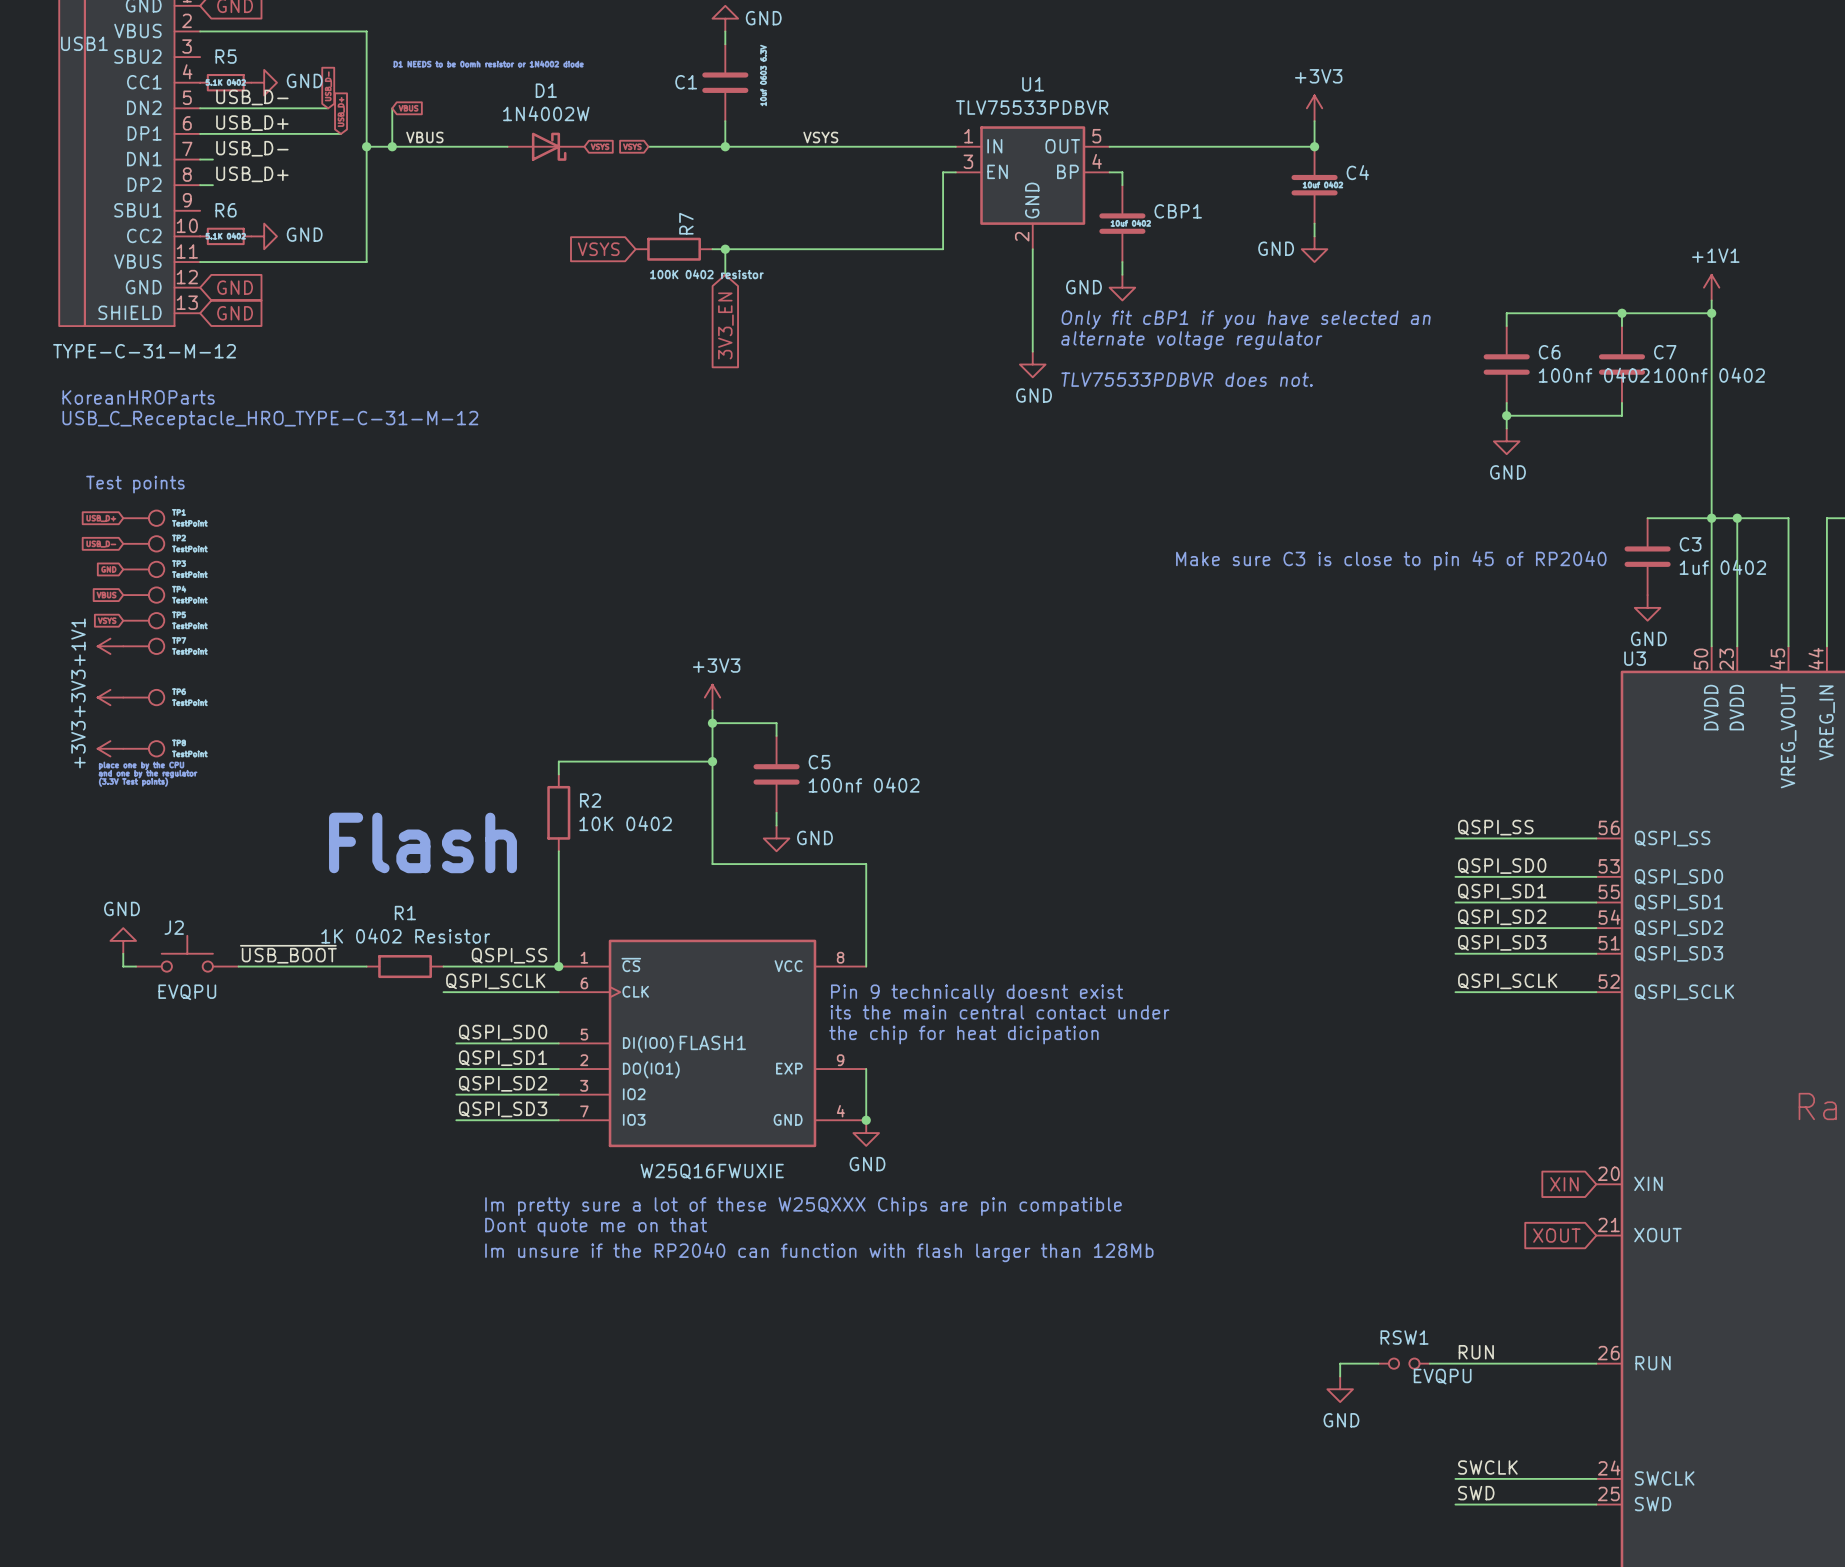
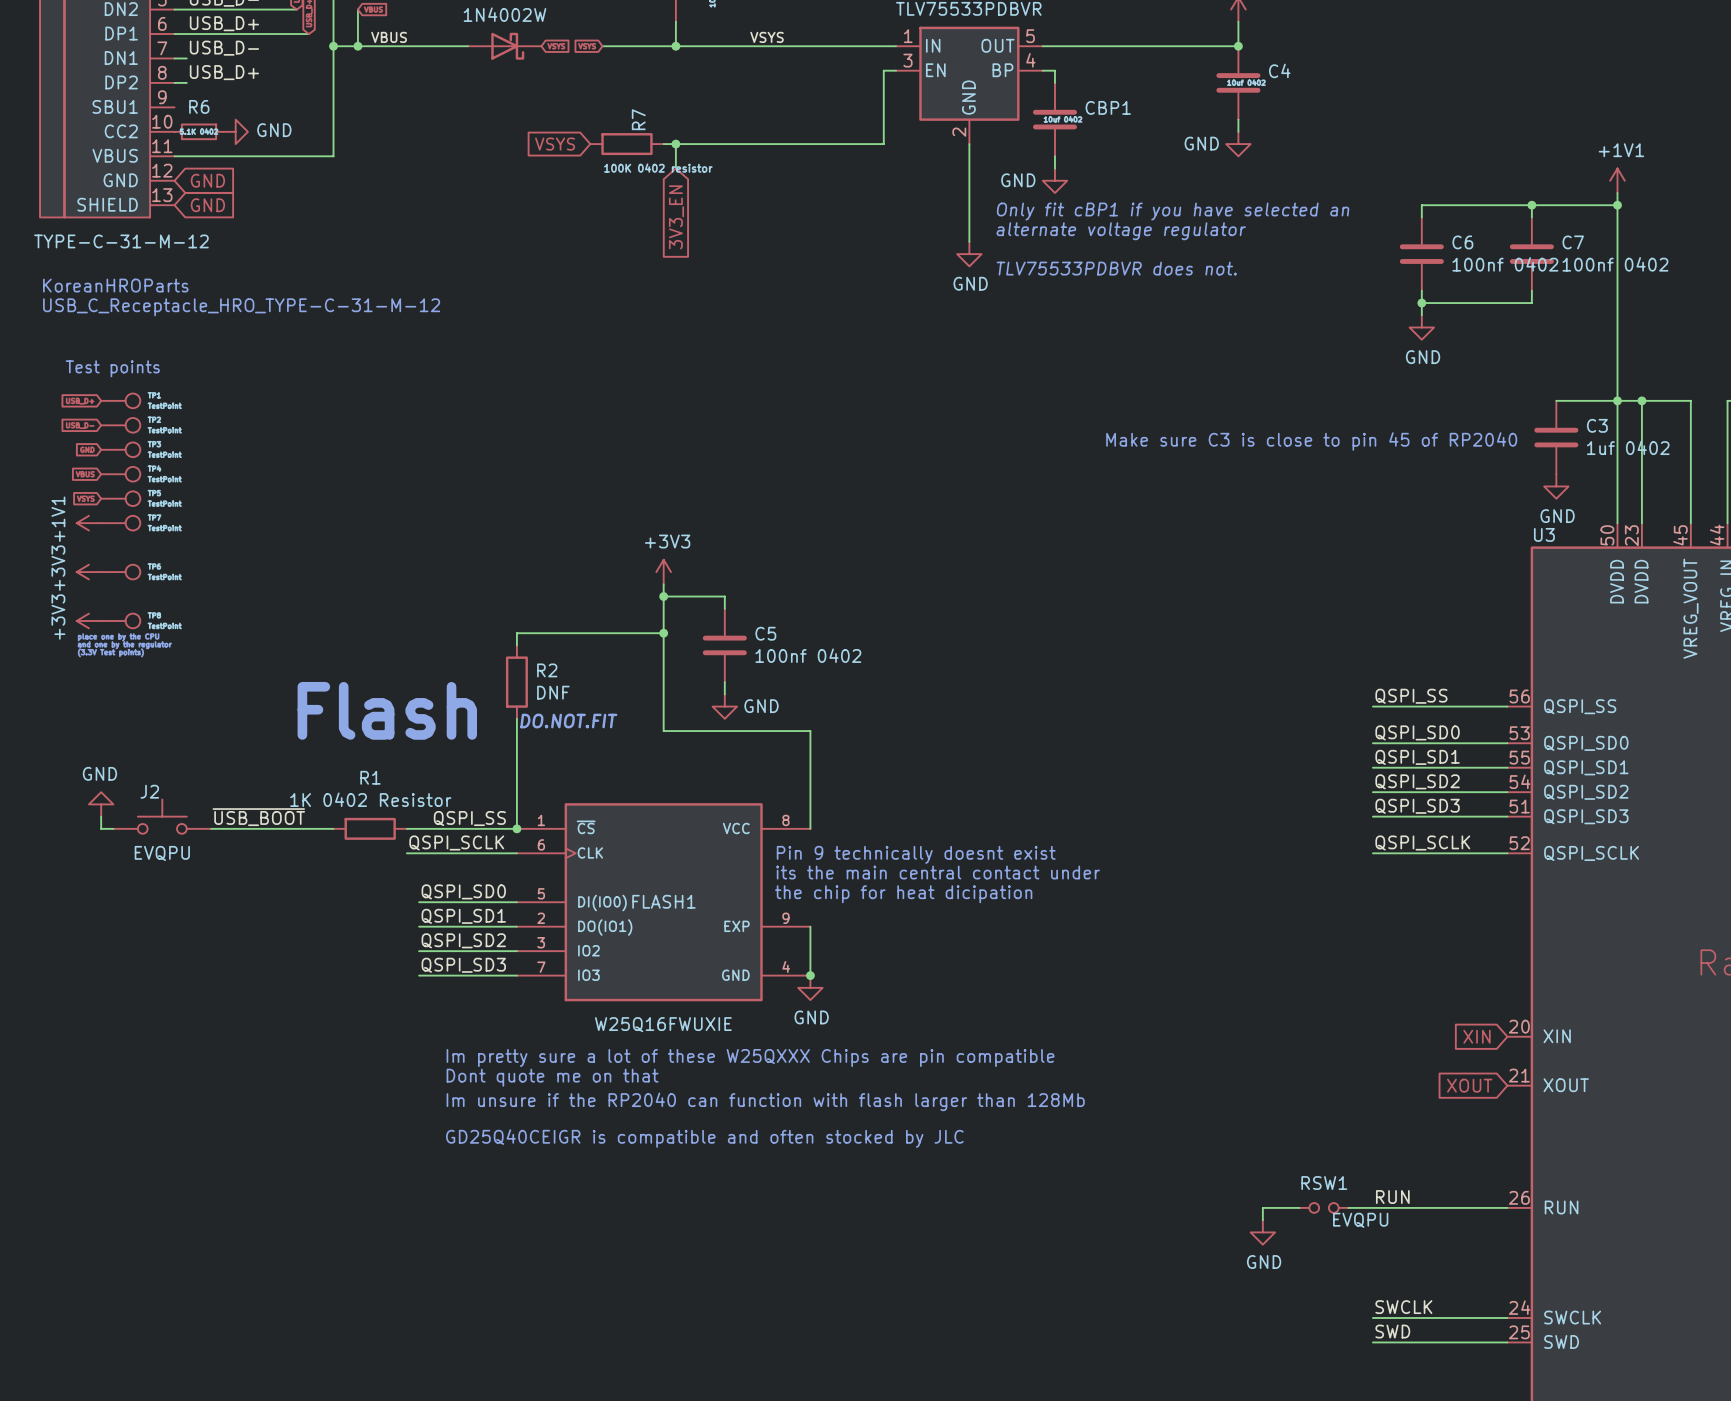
R2 value: 10K 0402 (625, 823) -> DNF (553, 692)
text: none -> DO.NOT.FIT (568, 721)
text: none -> GD25Q40CEIGR is compatible and often stocked by JLC (704, 1138)

